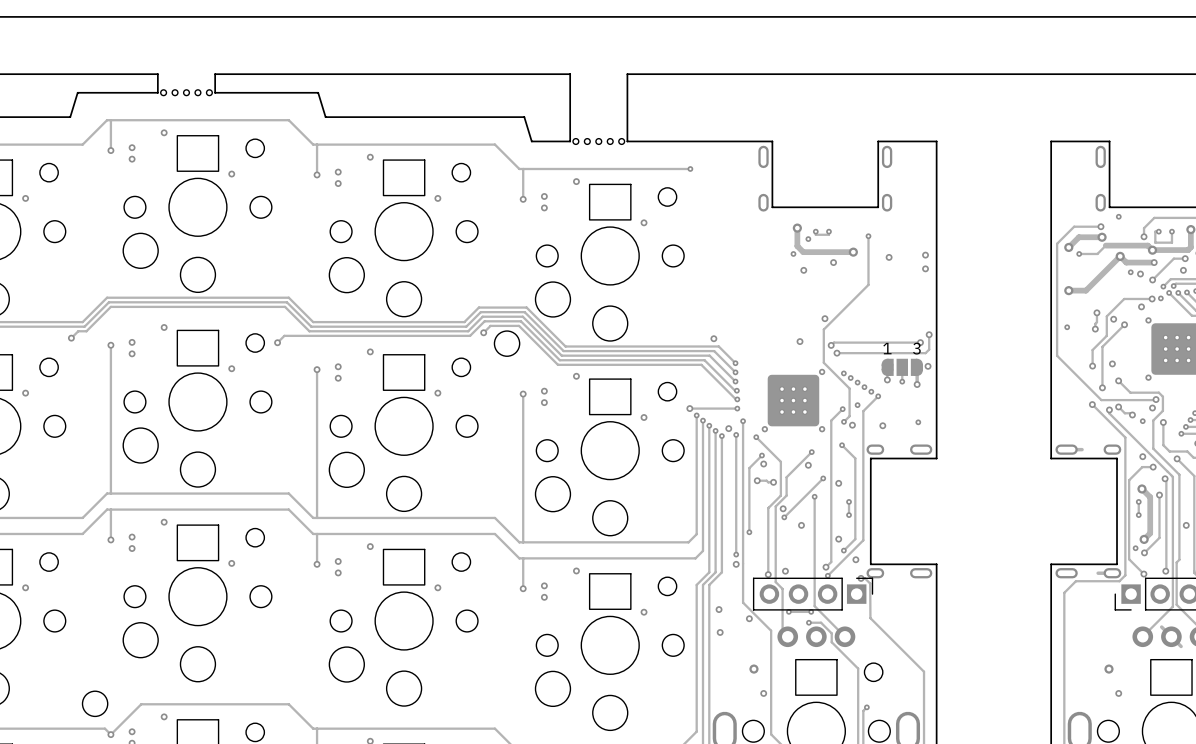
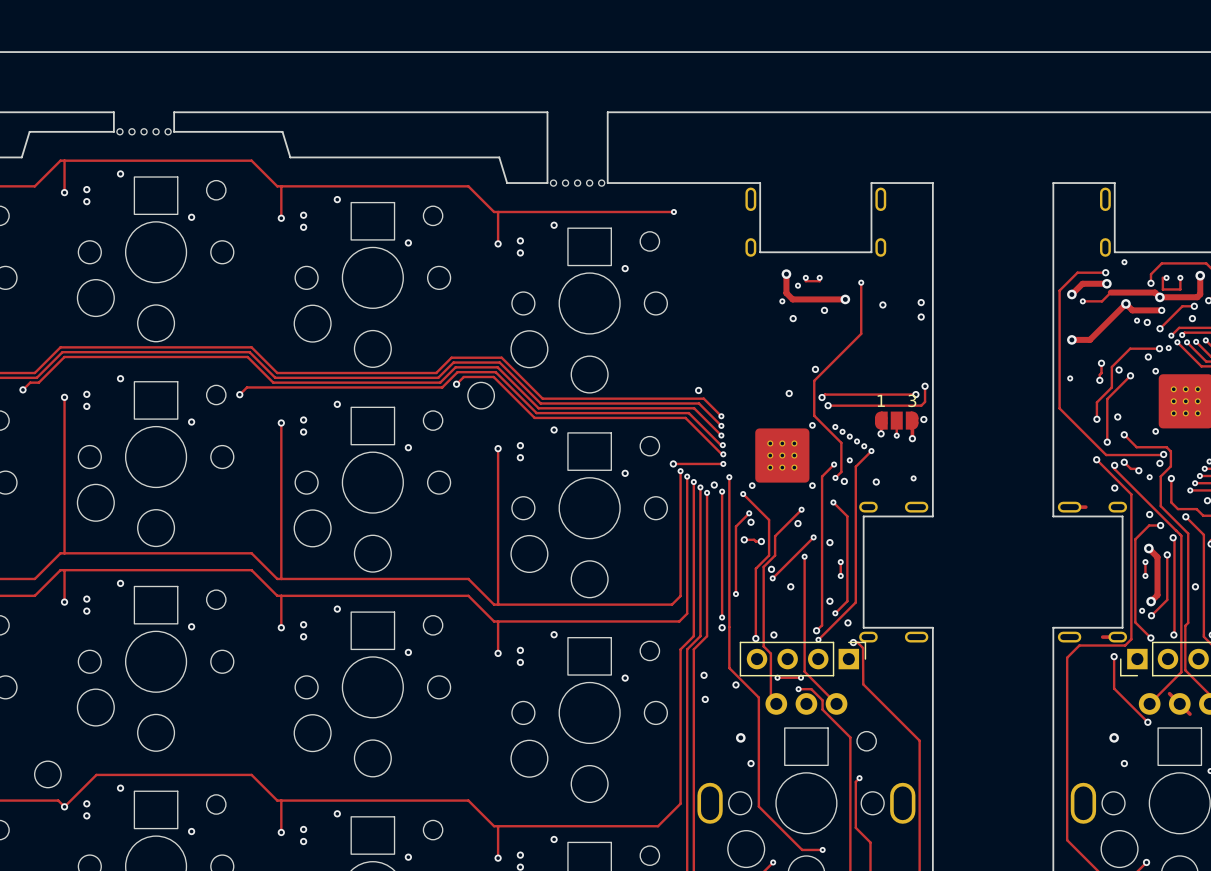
via: none -> (1114, 488)
track: none -> (1114, 656) (1114, 688) (1147, 722)
via: none -> (1114, 656)
via: none -> (1147, 722)

